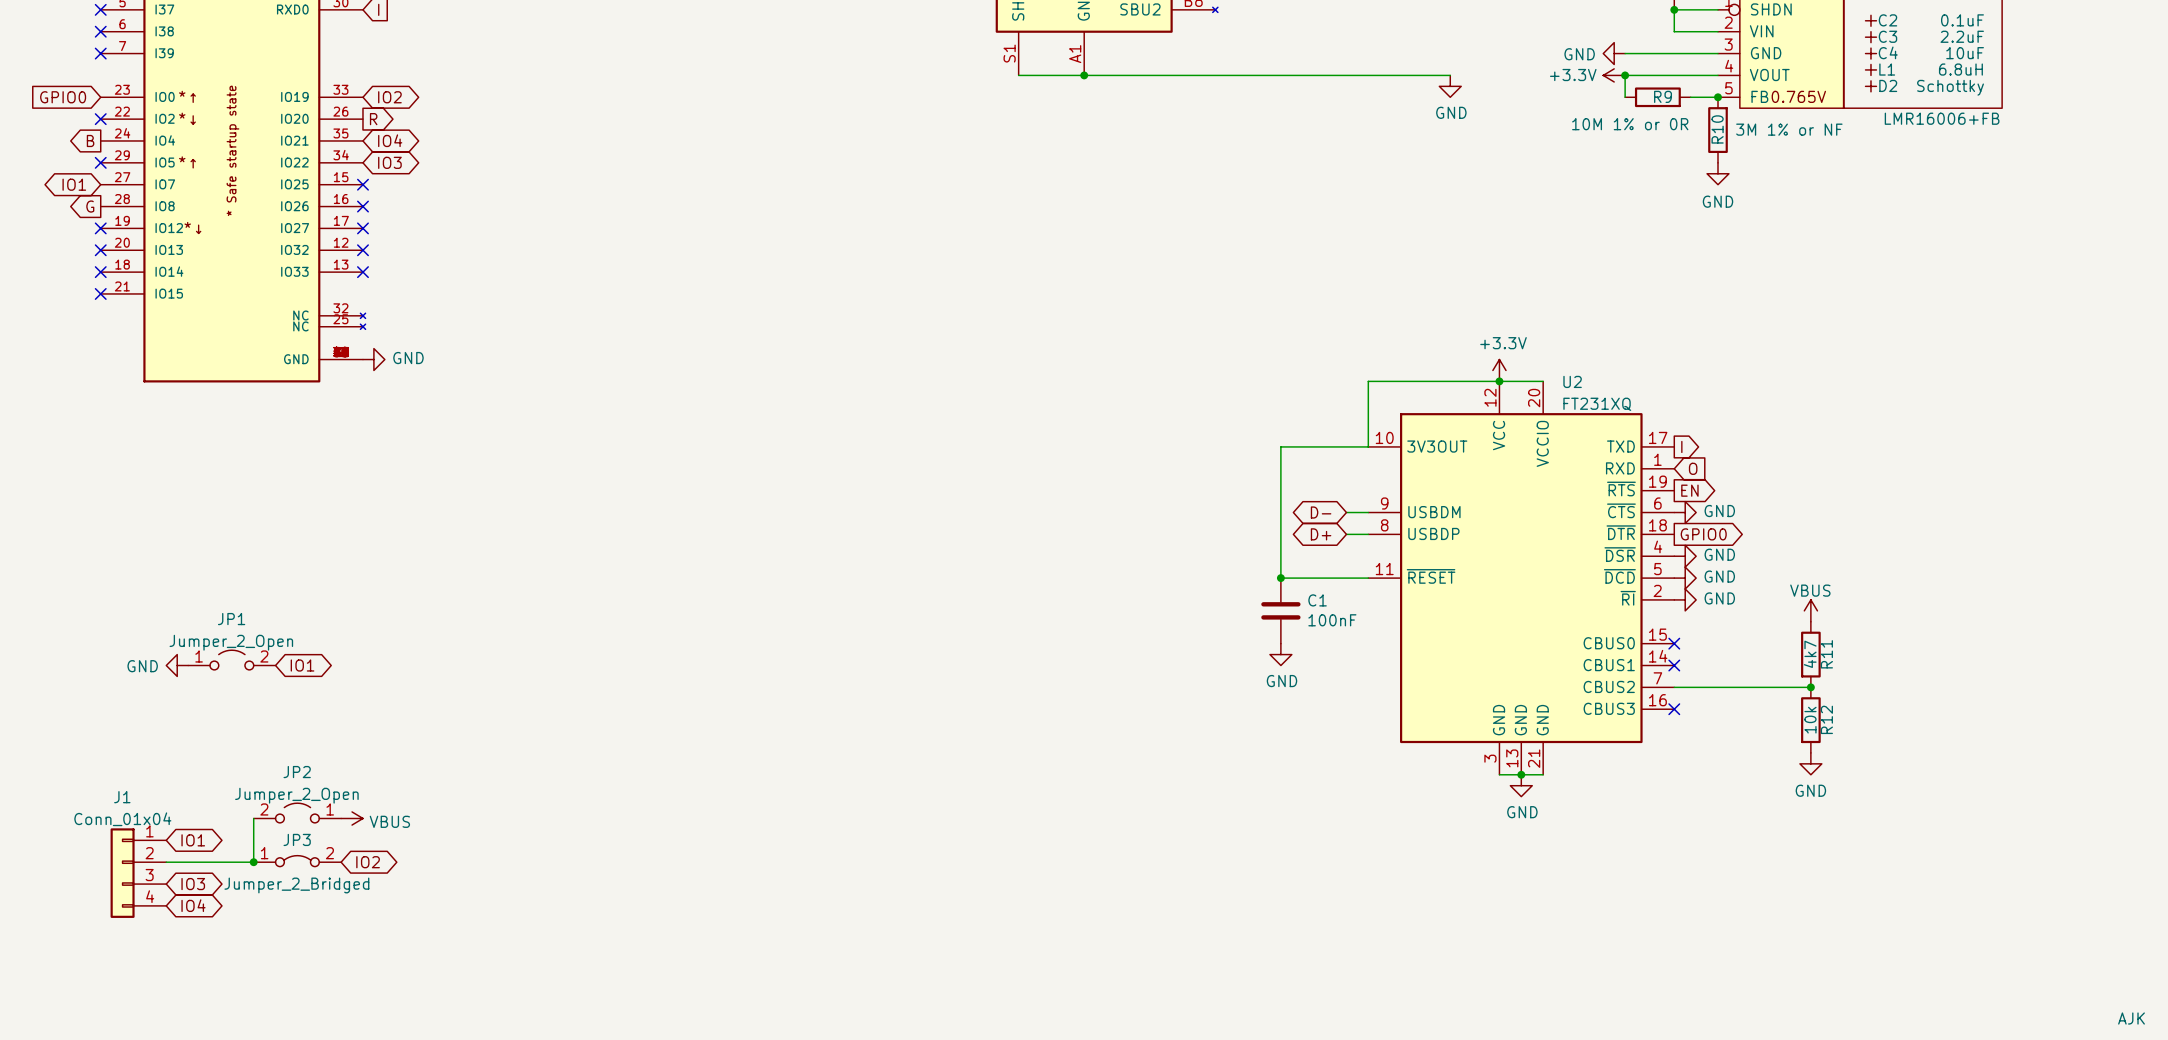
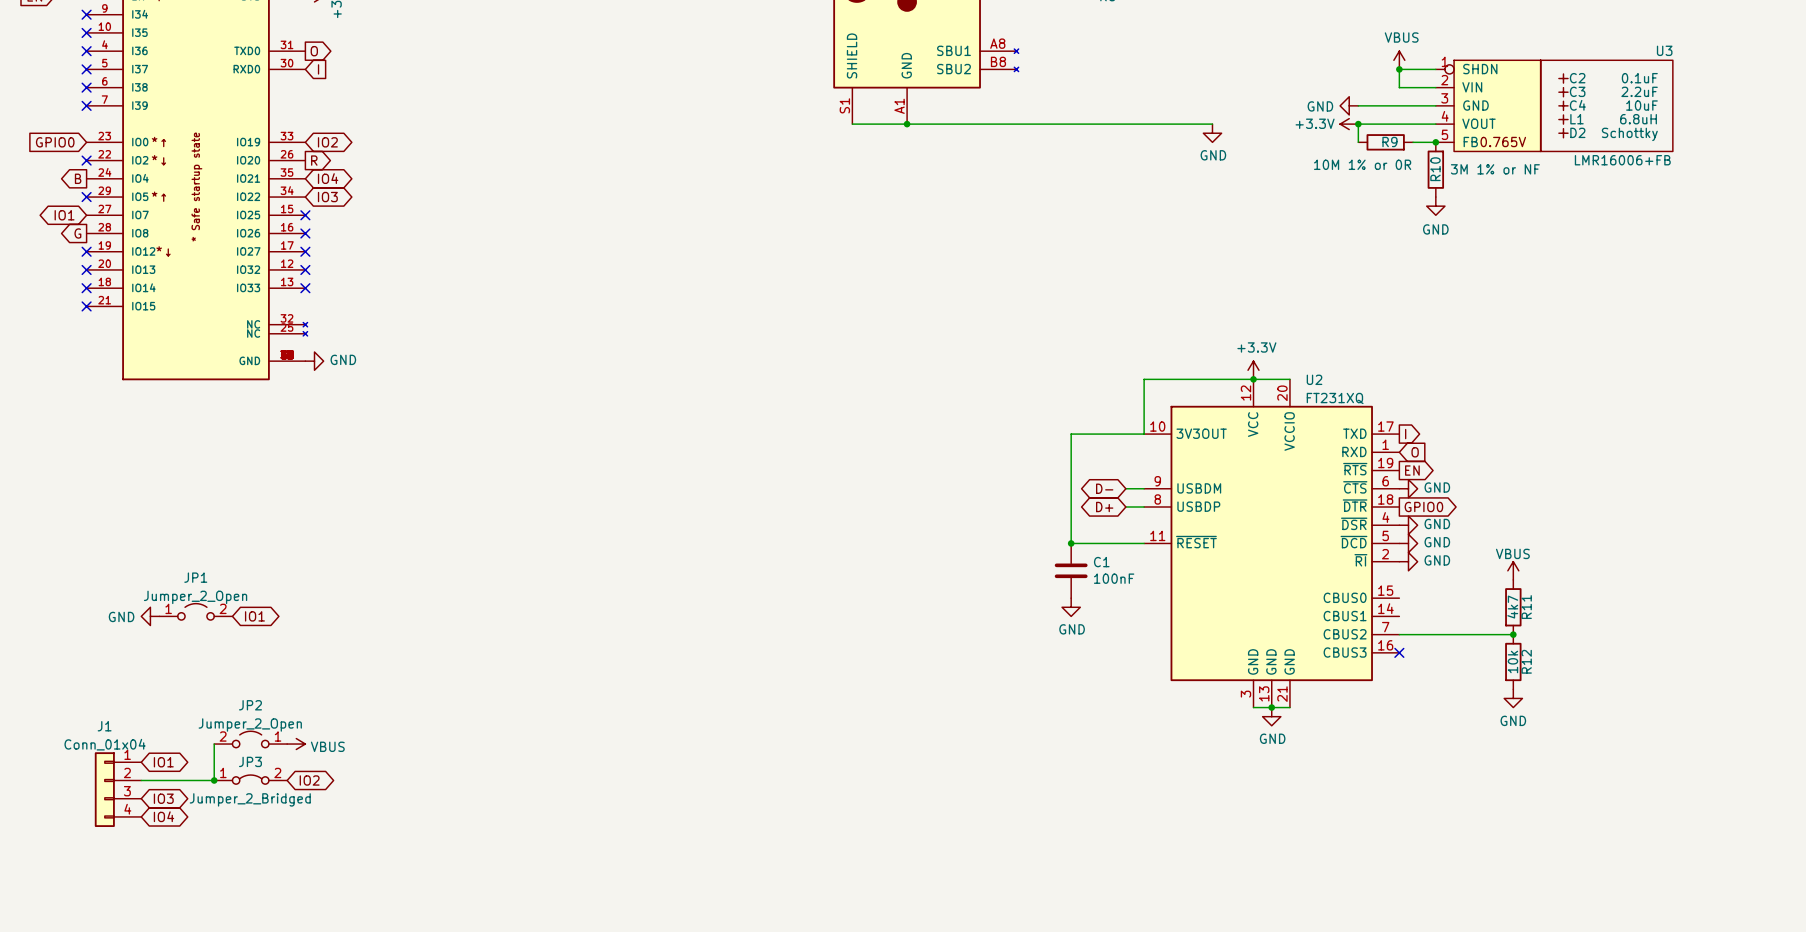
no-connect mark: (1674, 643) -> none
no-connect mark: (1674, 665) -> none
part: AJK (2131, 1018) -> none

